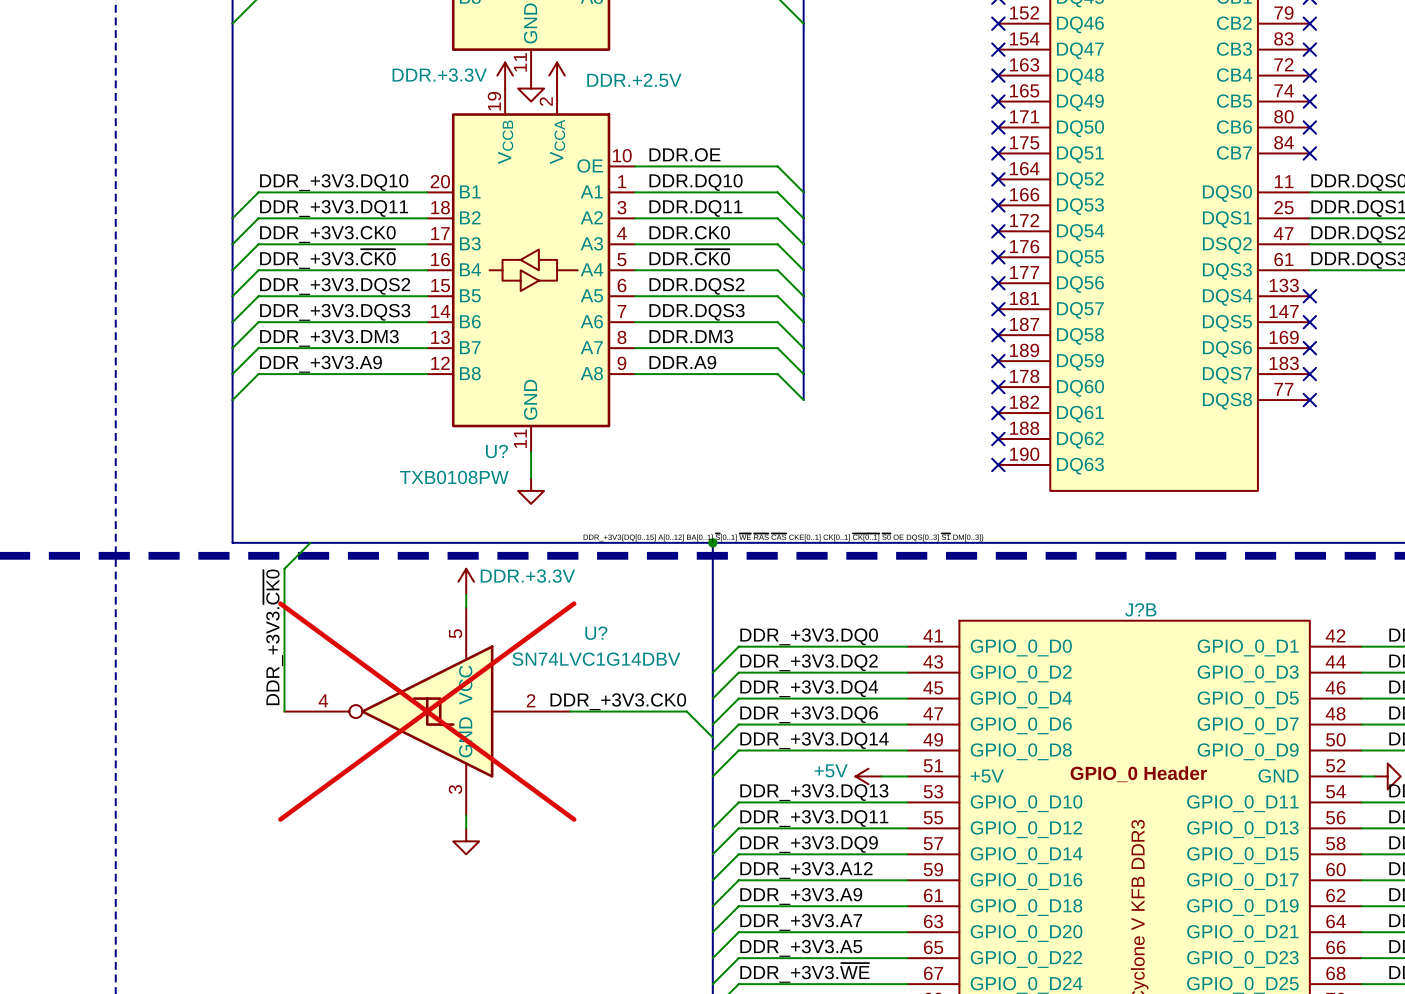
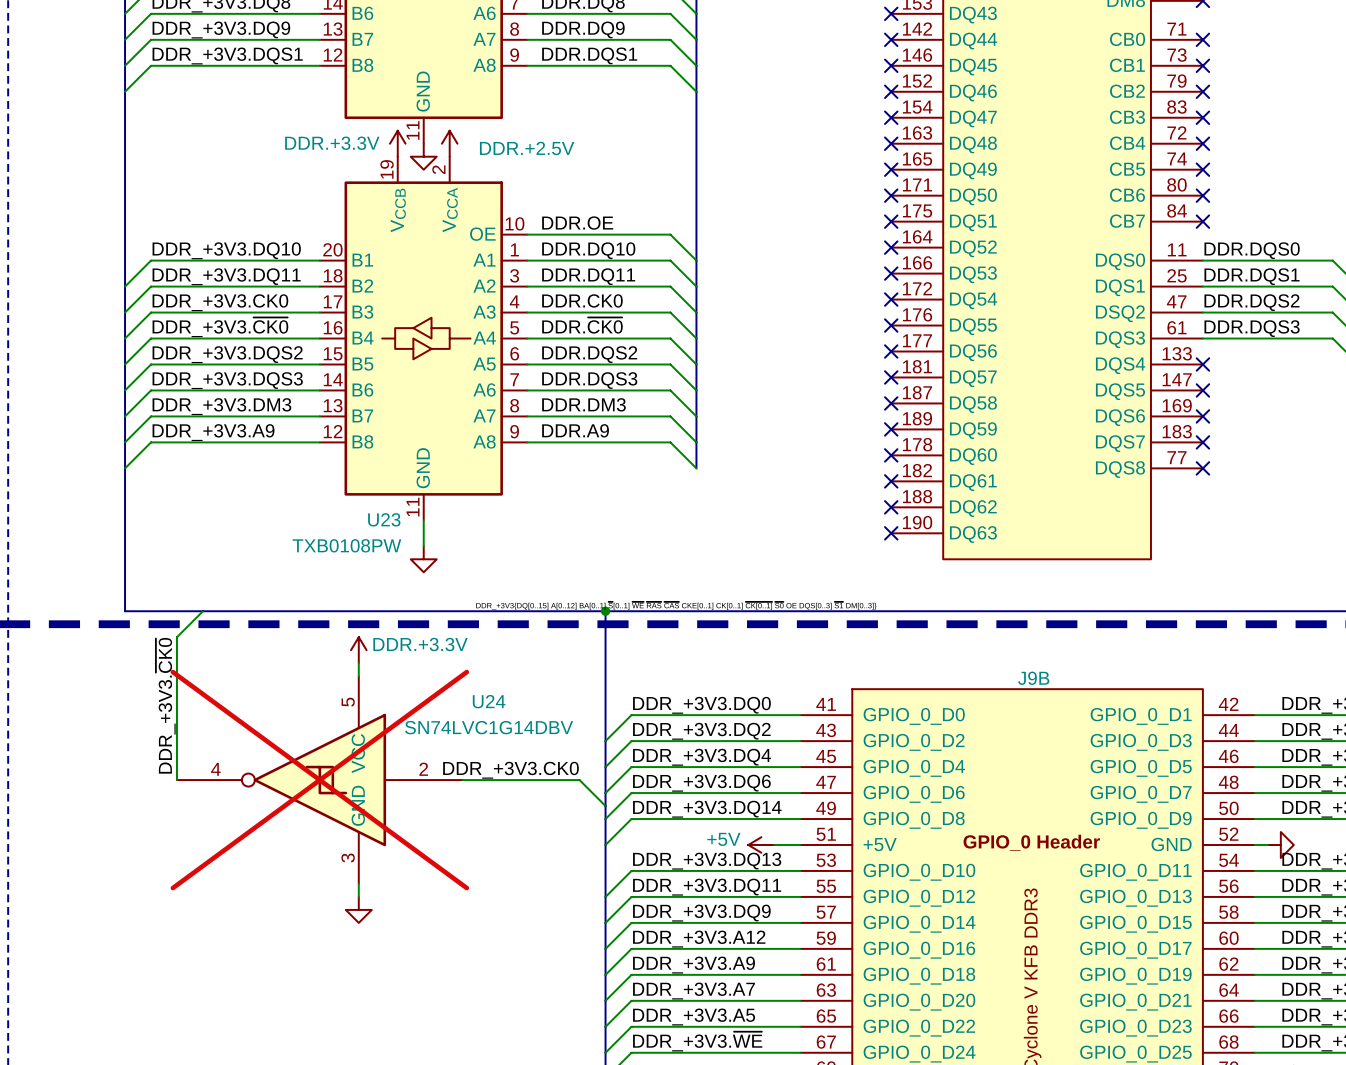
U? name: U? (496, 451) -> U23 (384, 519)
J?B name: J?B (1140, 609) -> J9B (1033, 678)
U? name: U? (596, 633) -> U24 (489, 701)

